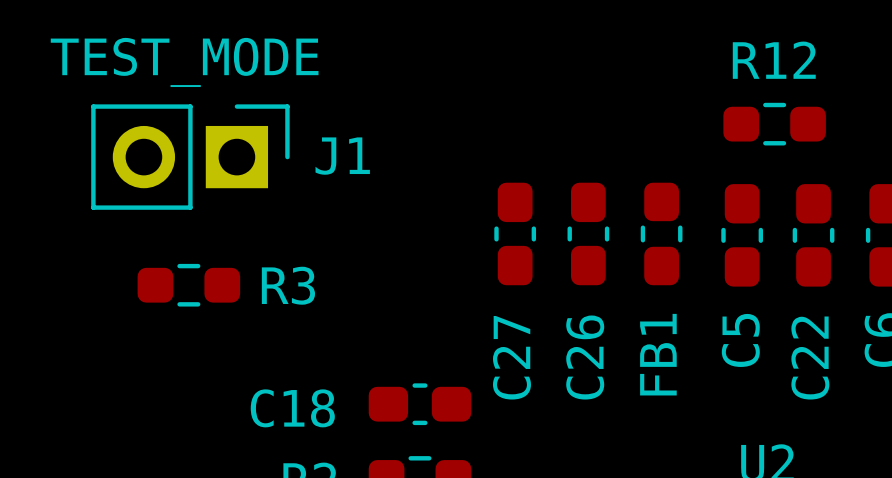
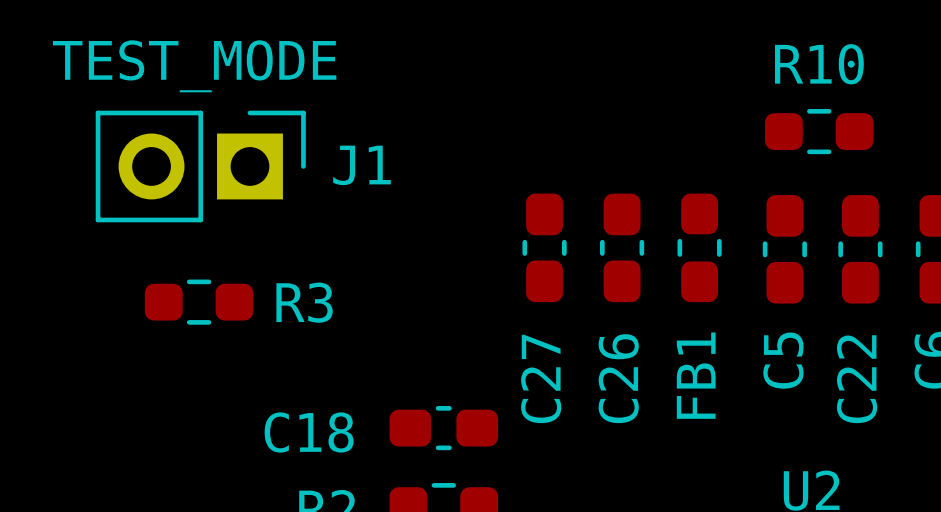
R12 name: R12 (774, 60) -> R10 (819, 64)

